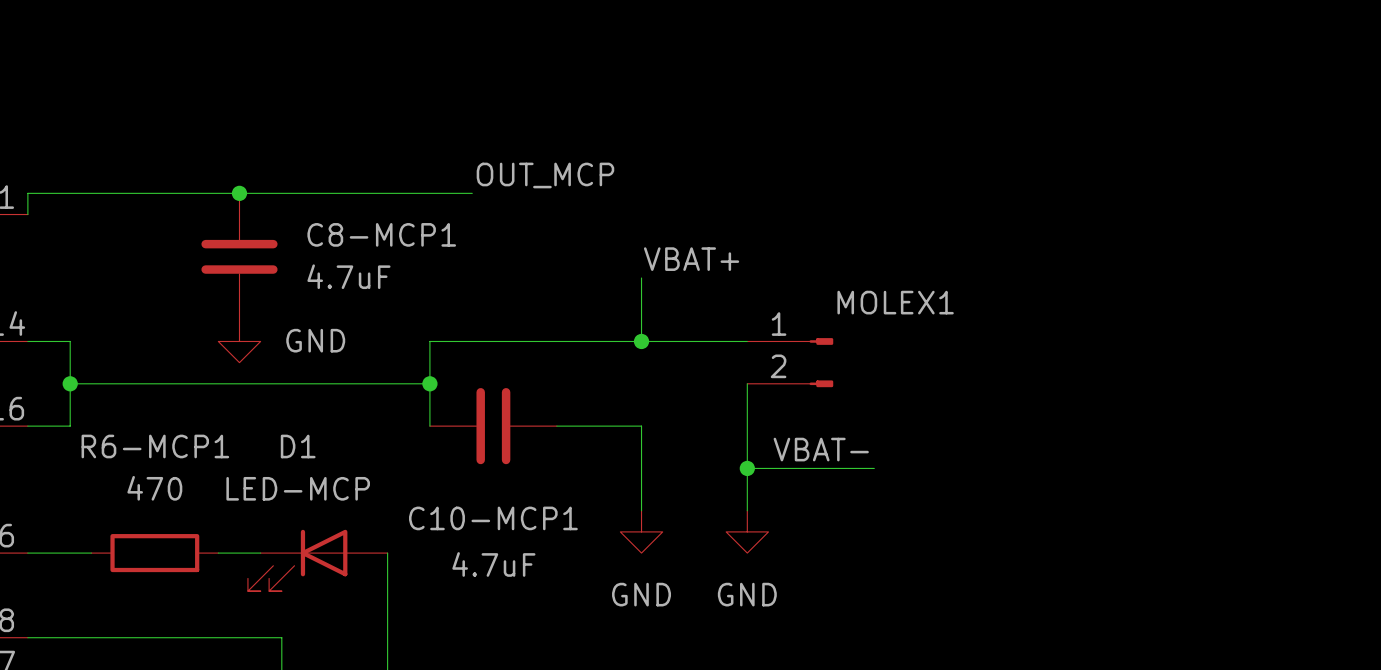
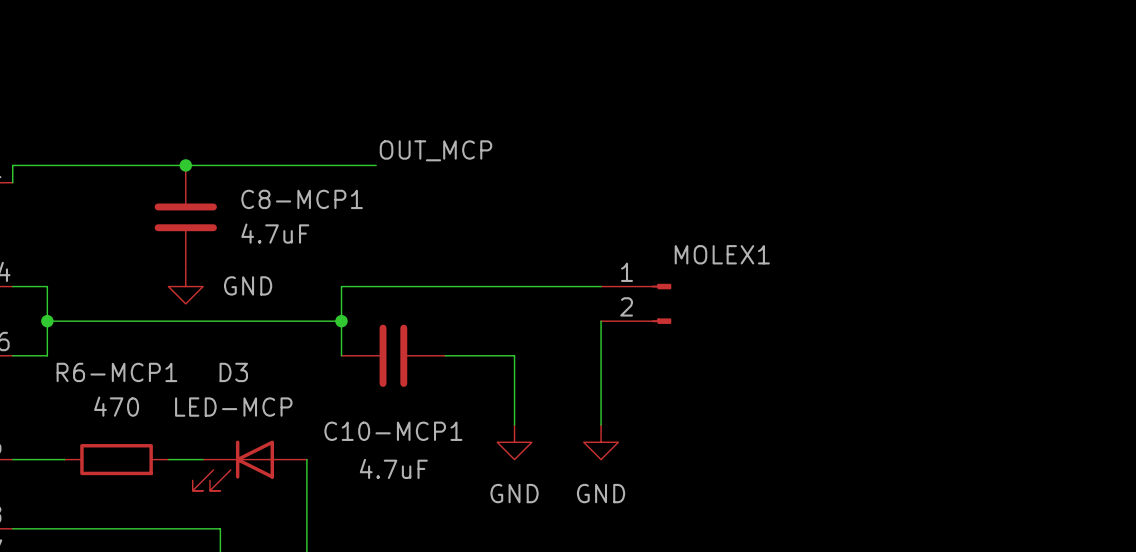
label: VBAT+ (691, 259) -> none
wire: (641, 278) (641, 341) -> none
junction: (641, 341) -> none
D1 name: D1 (298, 446) -> D3 (233, 372)
label: VBAT- (821, 449) -> none
wire: (747, 468) (874, 468) -> none
junction: (747, 468) -> none

